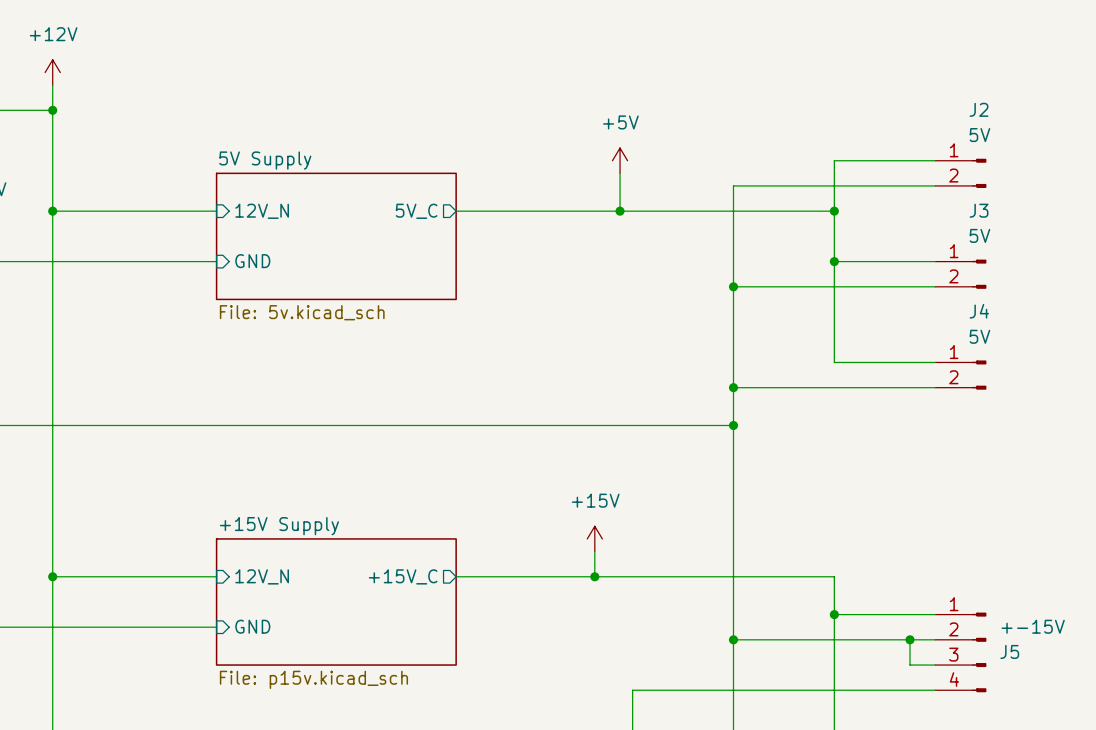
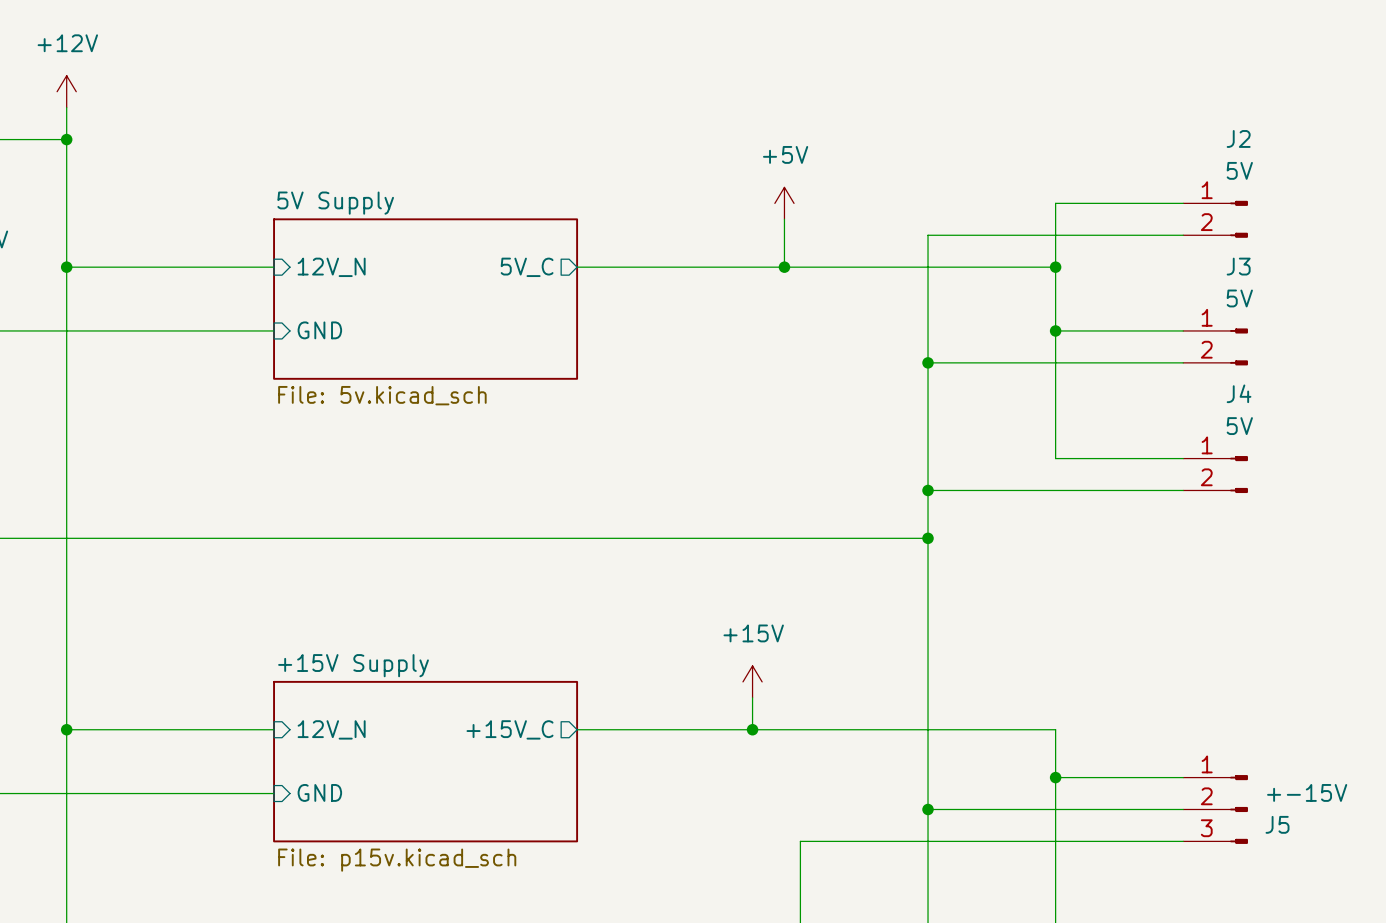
J5 symbol: [935, 612, 987, 693] -> [1183, 775, 1248, 844]
wire: (909, 639) (909, 665) -> none
junction: (909, 639) -> none
wire: (632, 690) (935, 690) -> (800, 873) (800, 841) (1151, 841)

